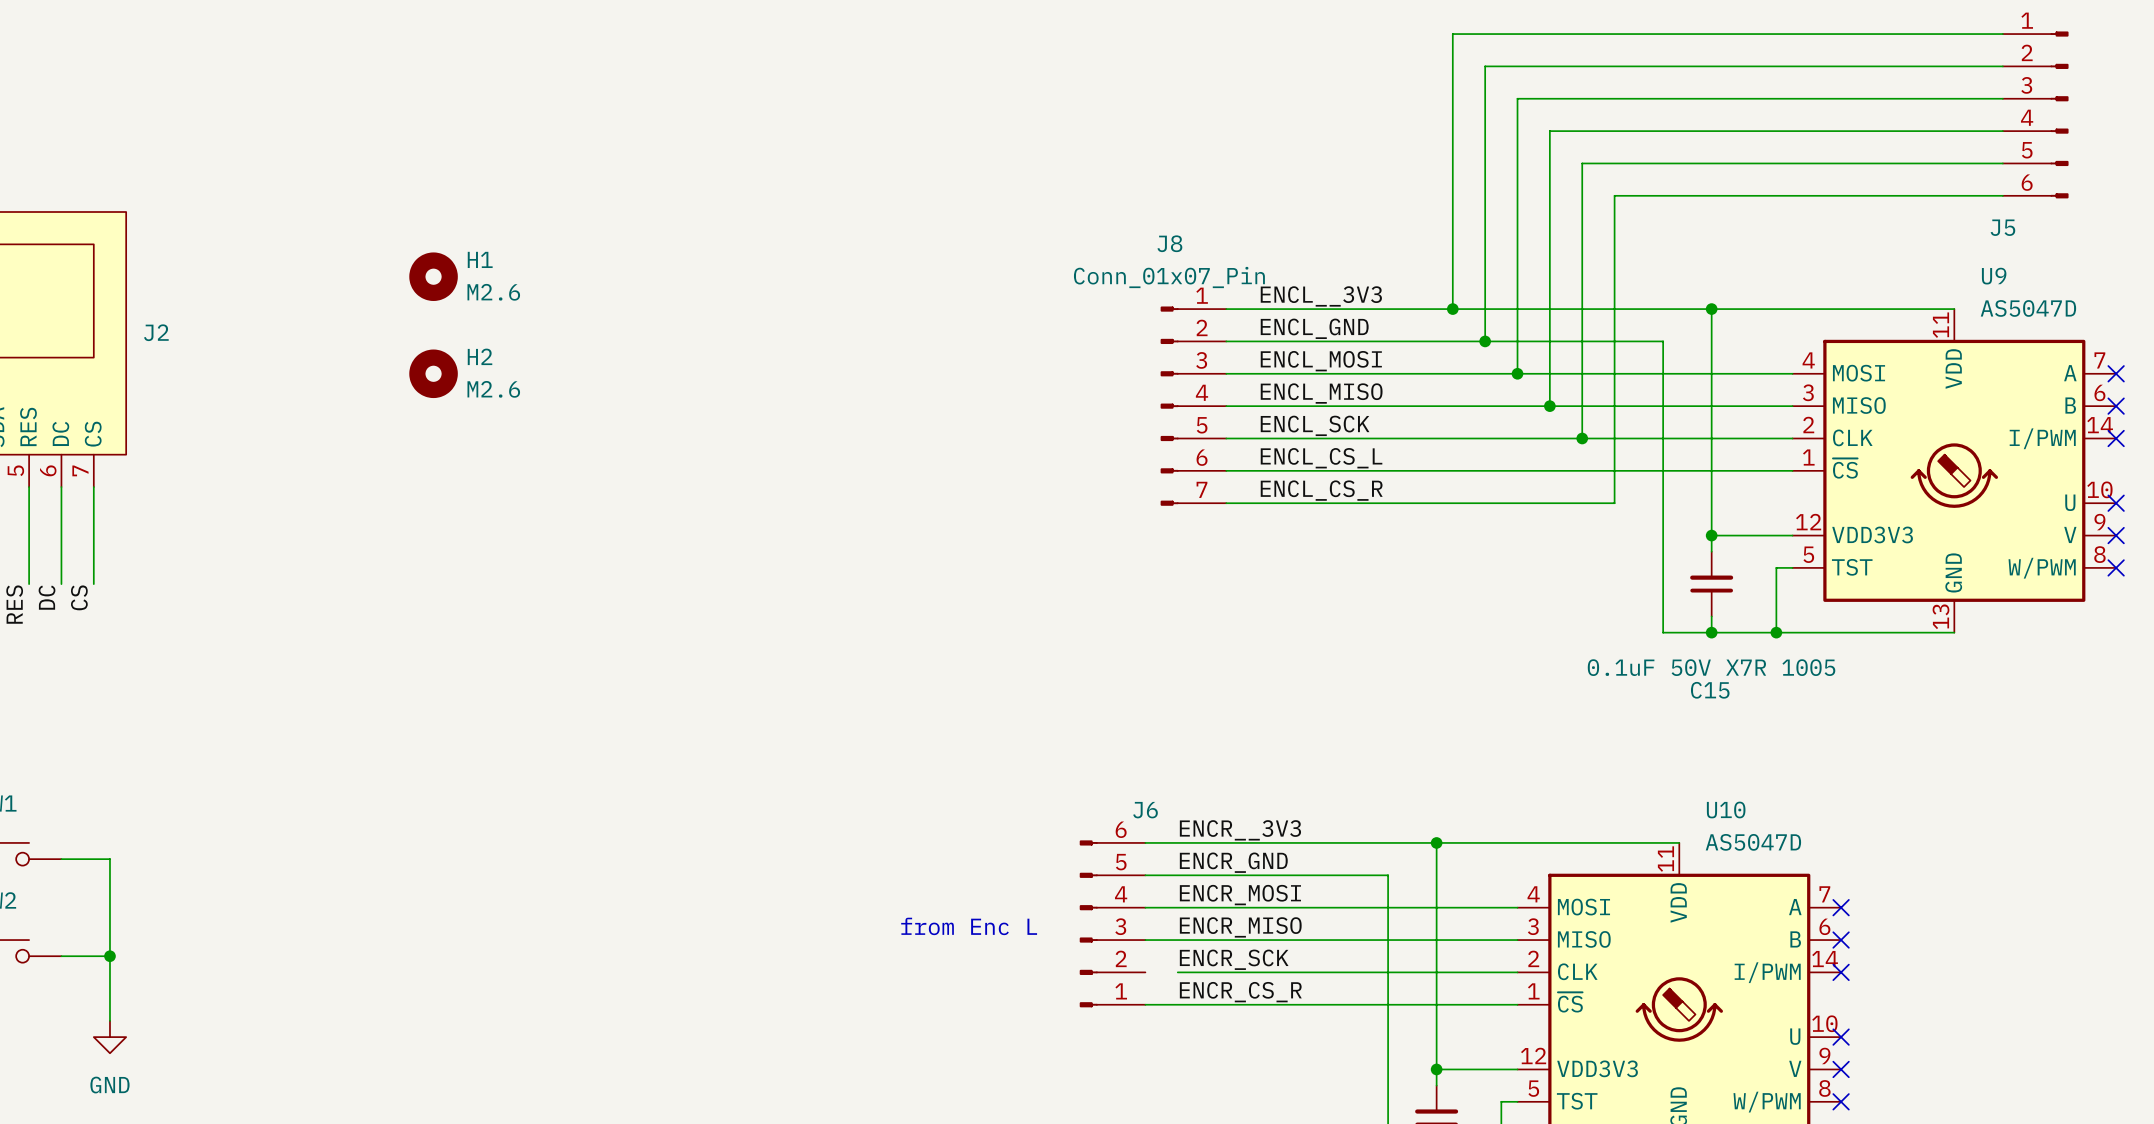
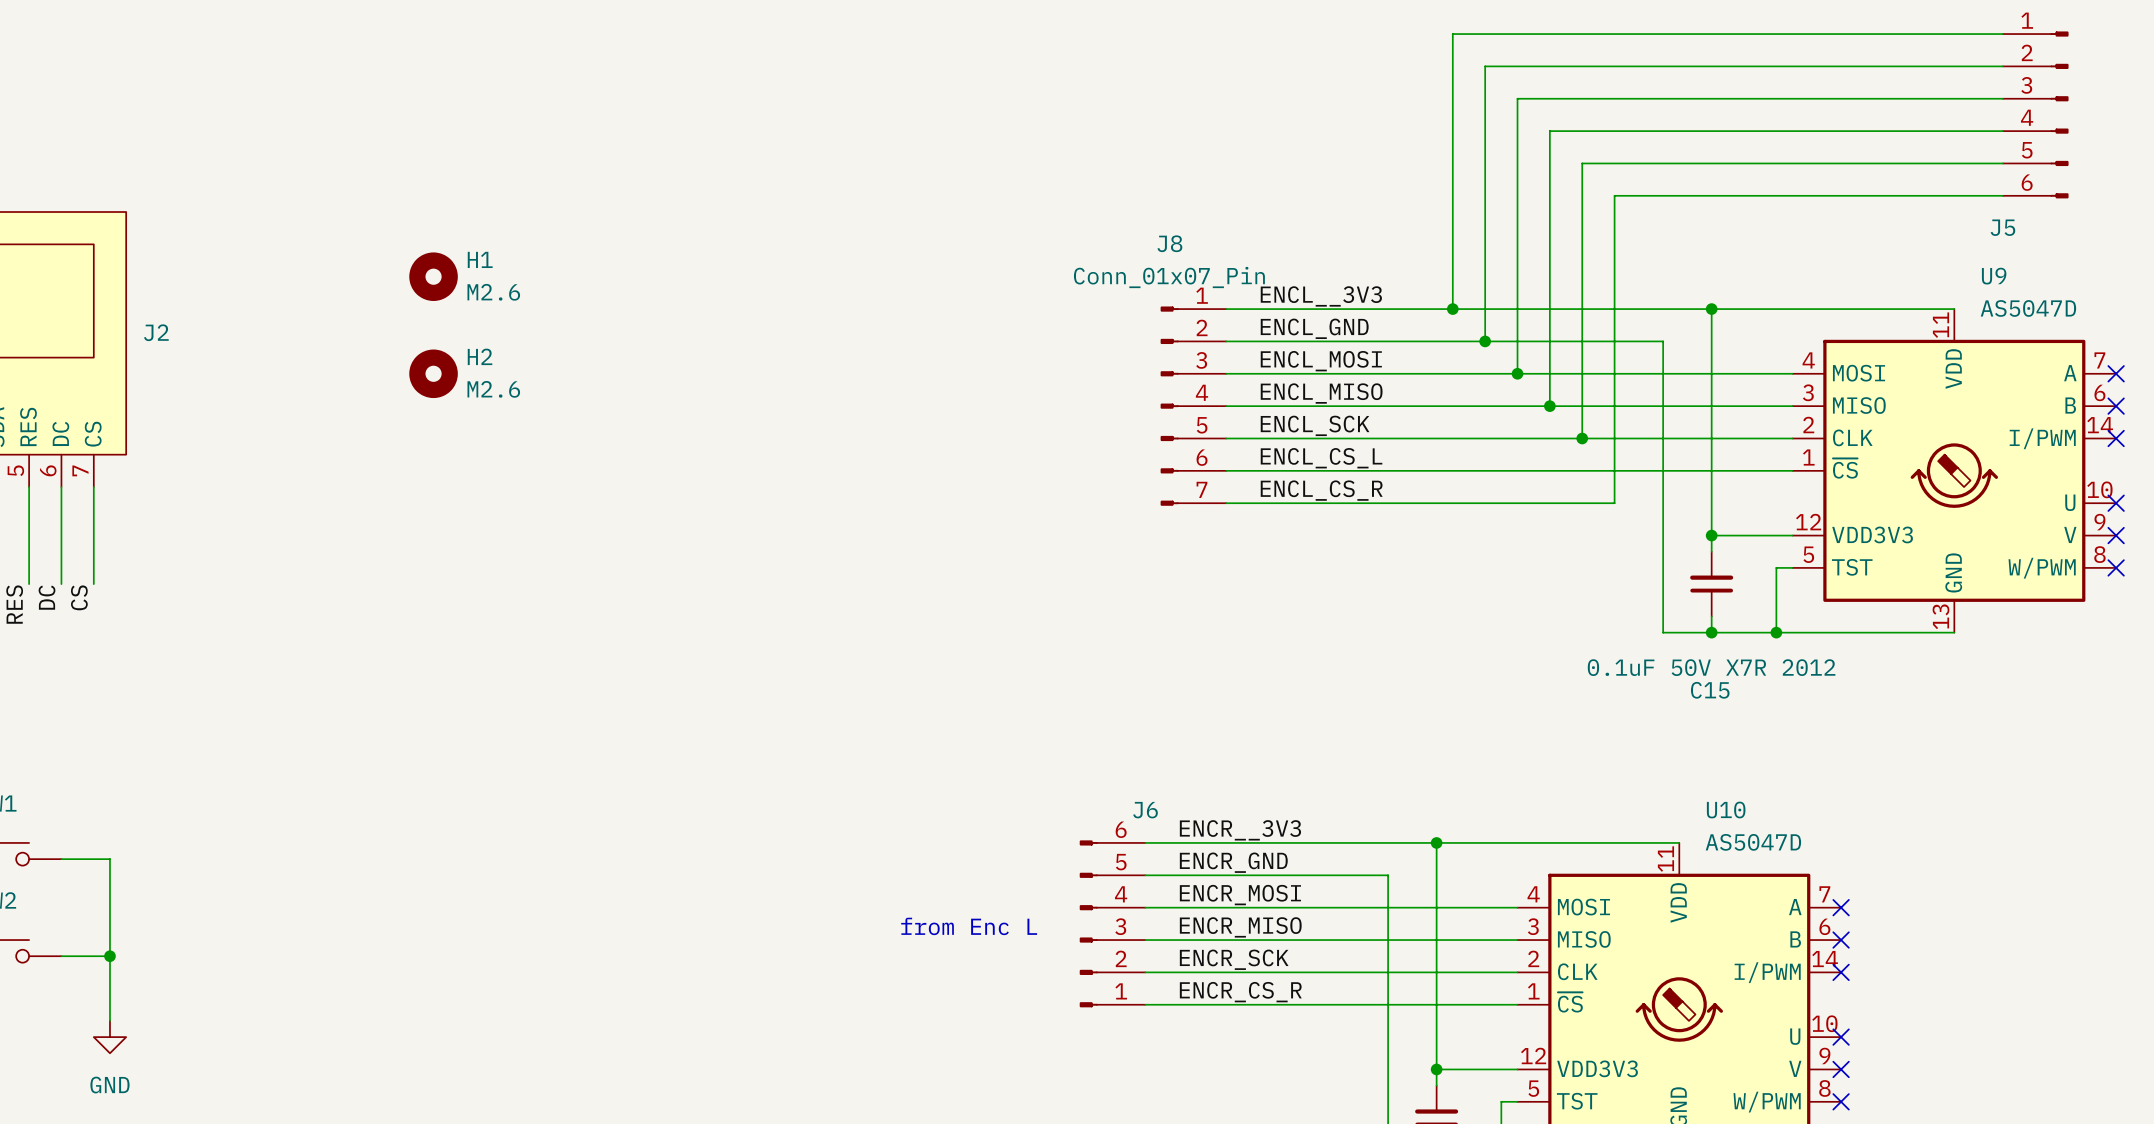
C15 text: 0.1uF 50V X7R 1005 (1711, 667) -> 0.1uF 50V X7R 2012 (1711, 667)
wire: none -> (1145, 972) (1177, 972)

